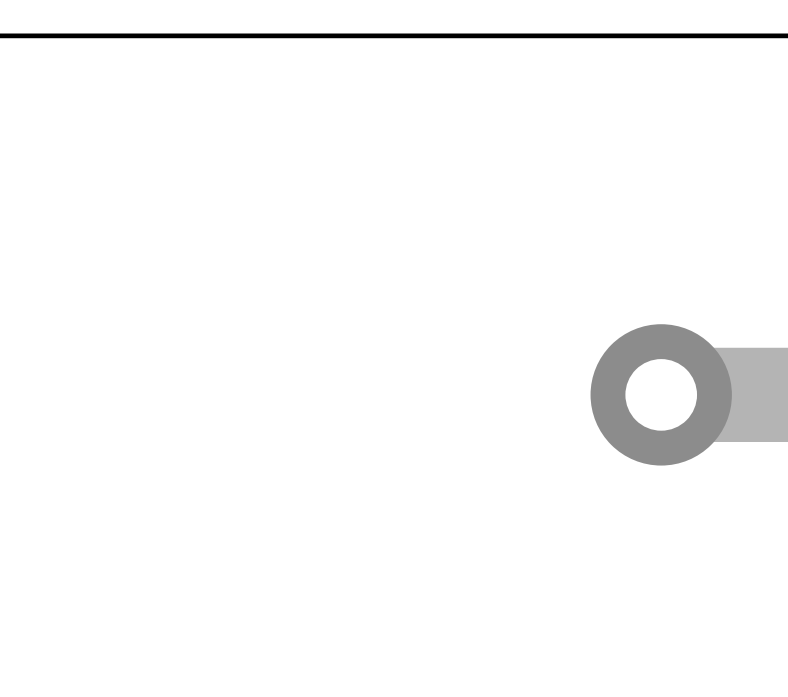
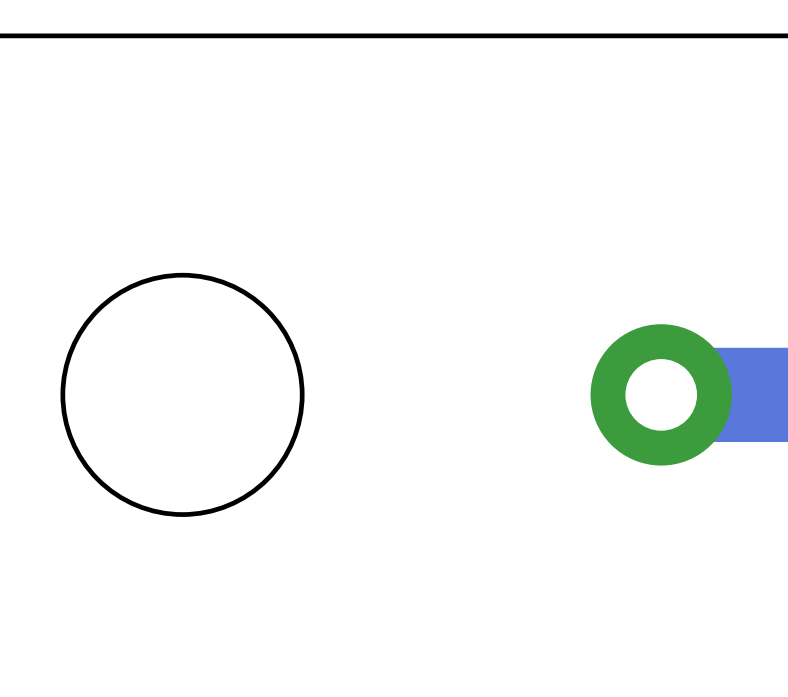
round board edge: none -> [60, 272, 305, 517]

